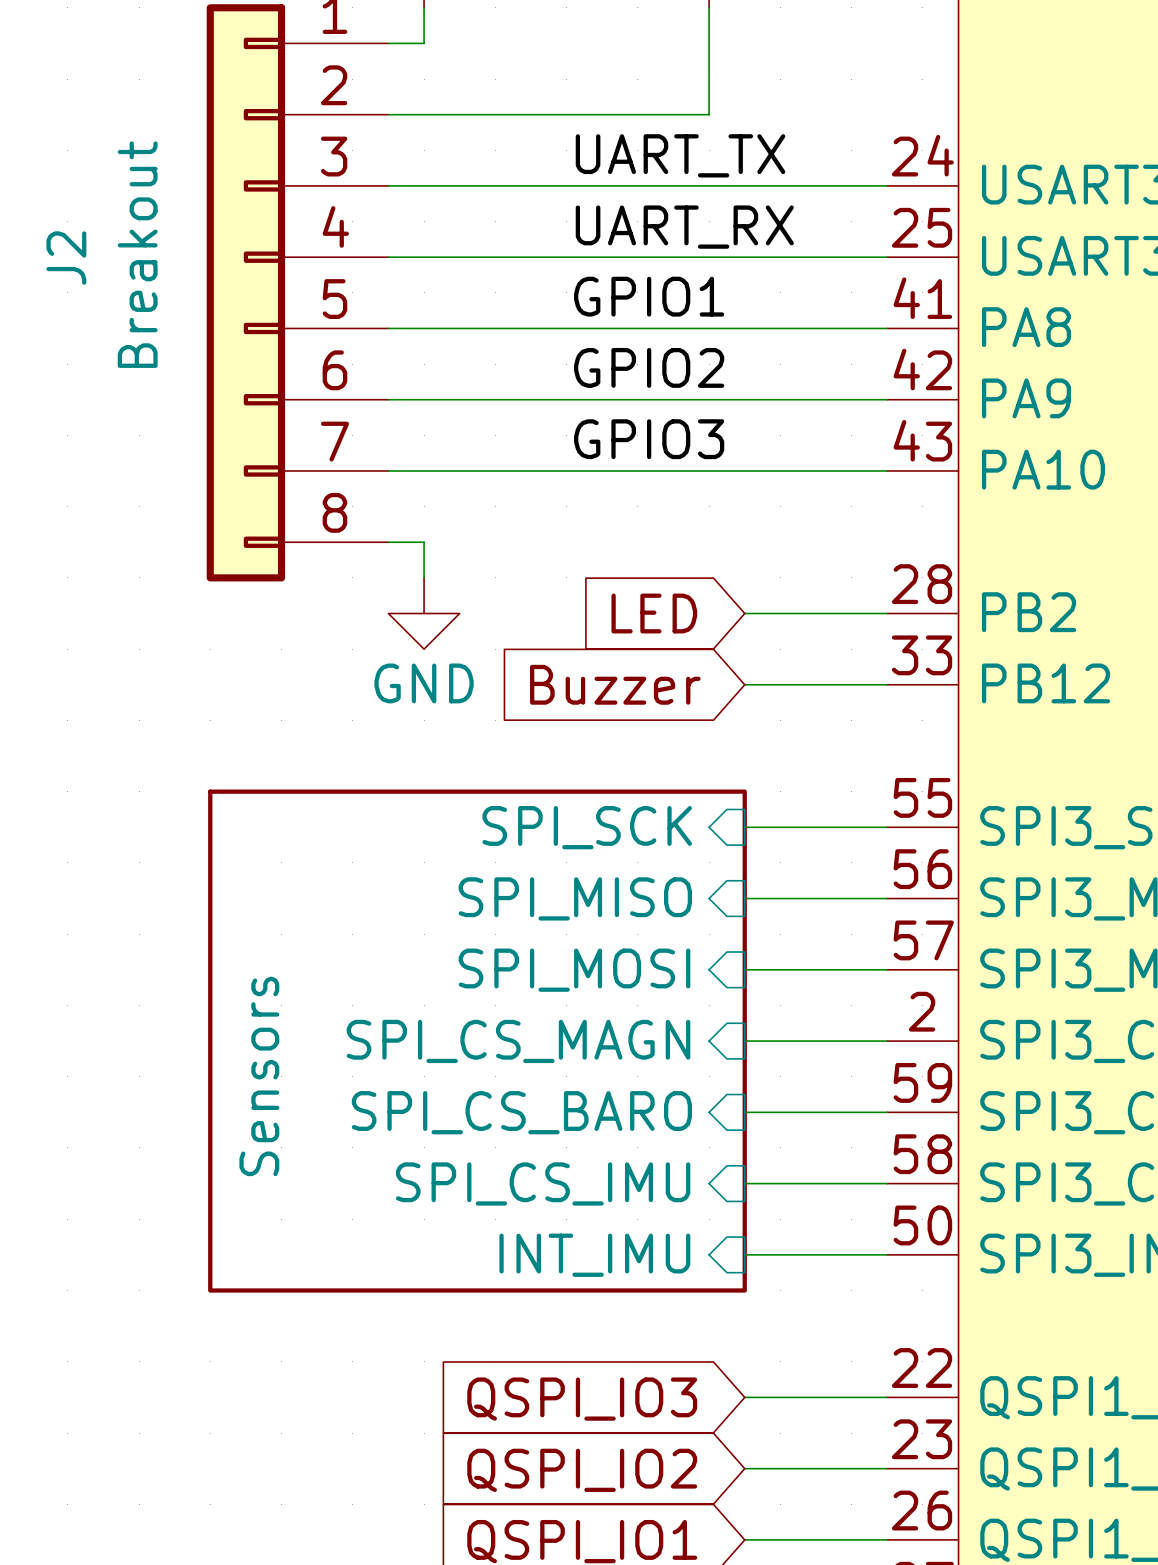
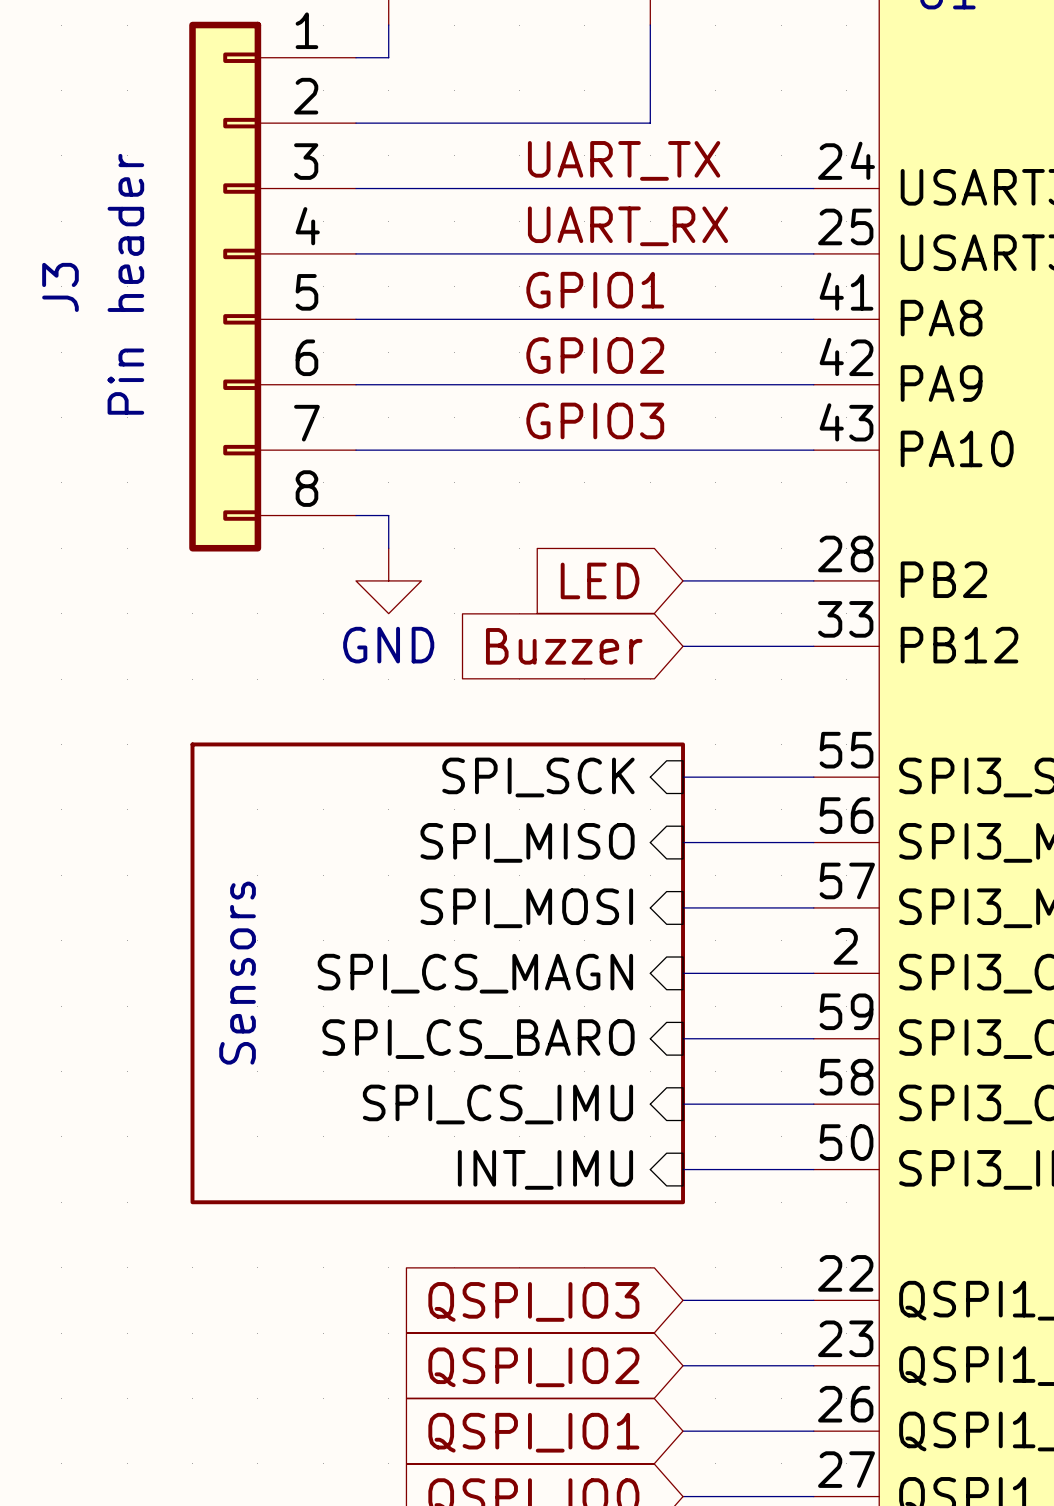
J2 value: Breakout (137, 254) -> Pin header (125, 284)
J2 name: J2 (66, 258) -> J3 (60, 287)
sheet Sensors name position: Sensors (259, 1076) -> Sensors (237, 973)

